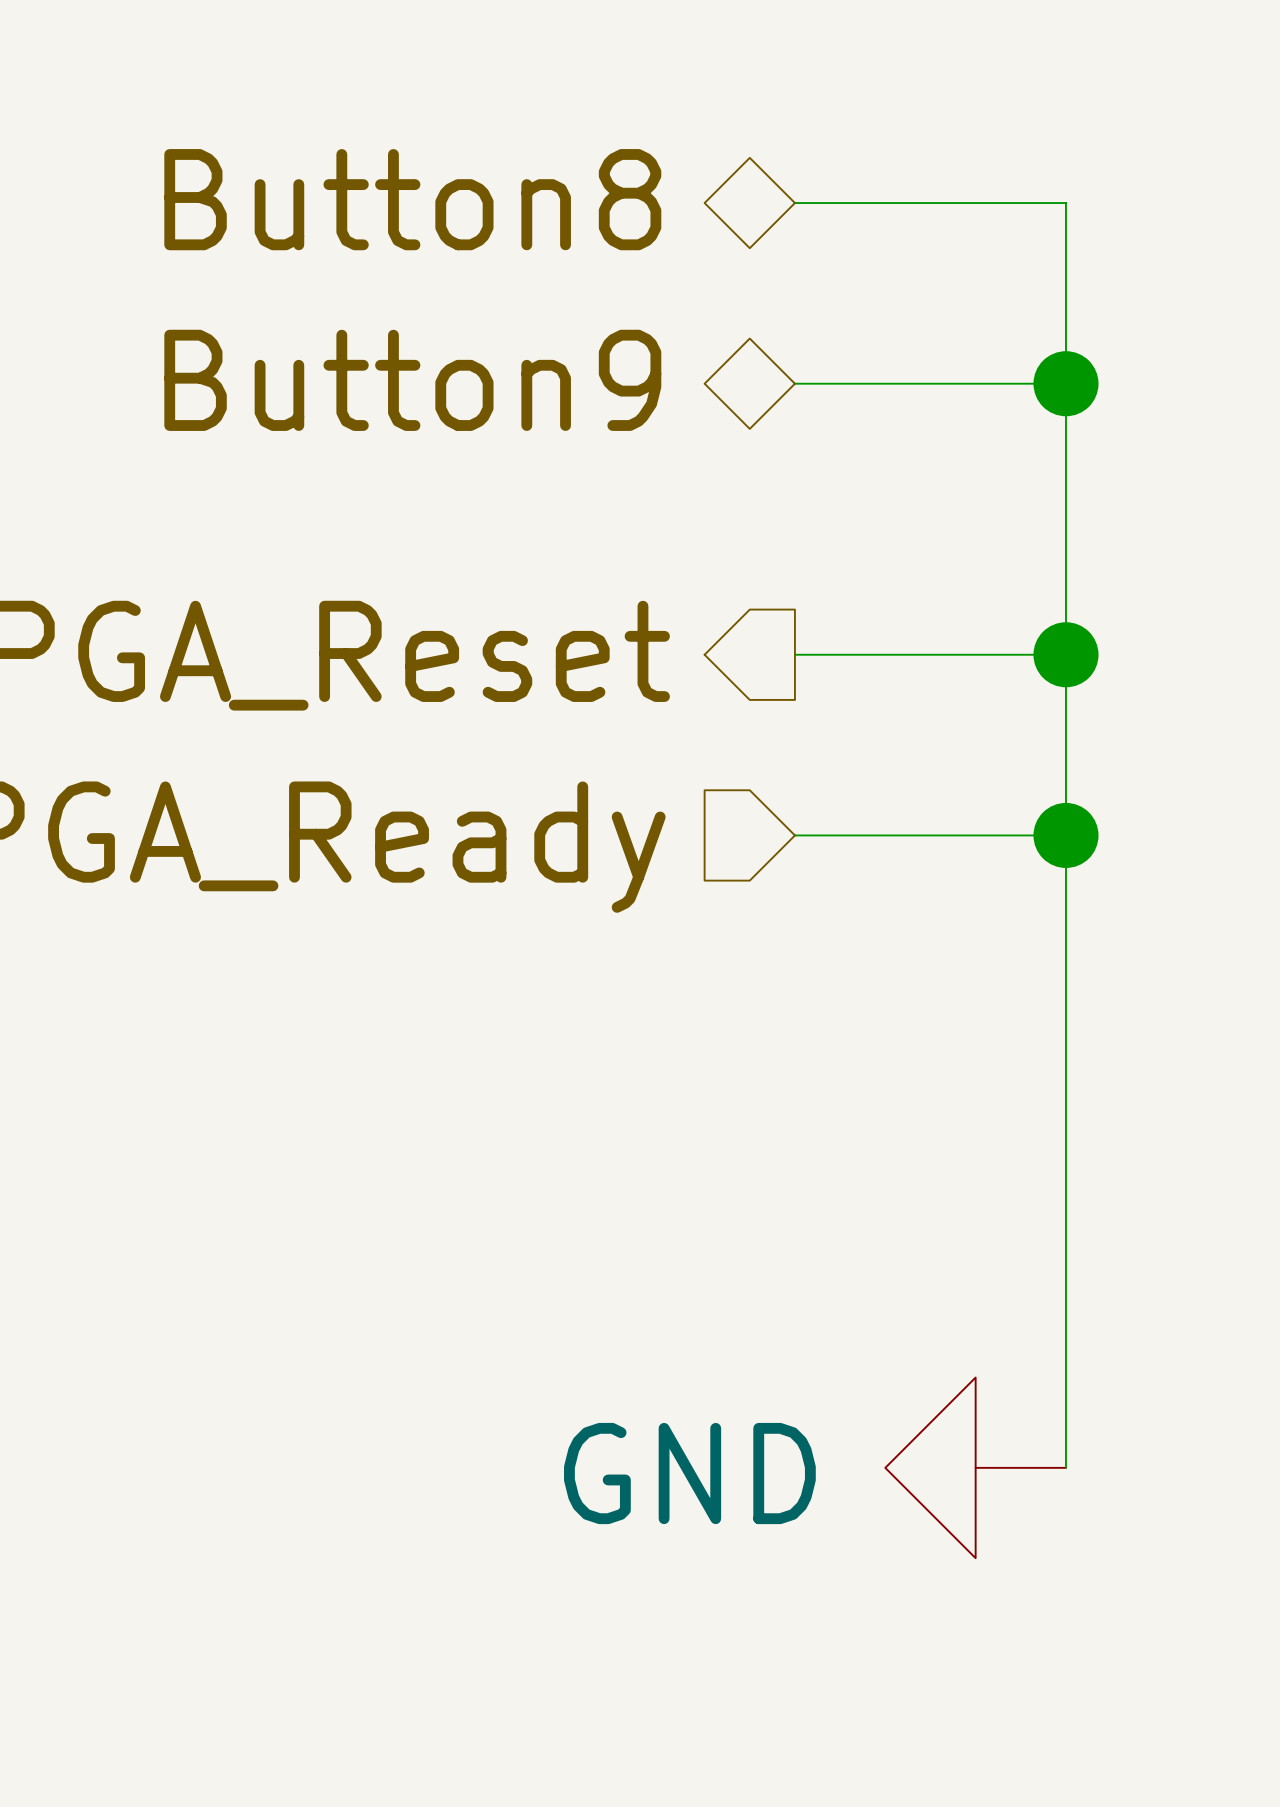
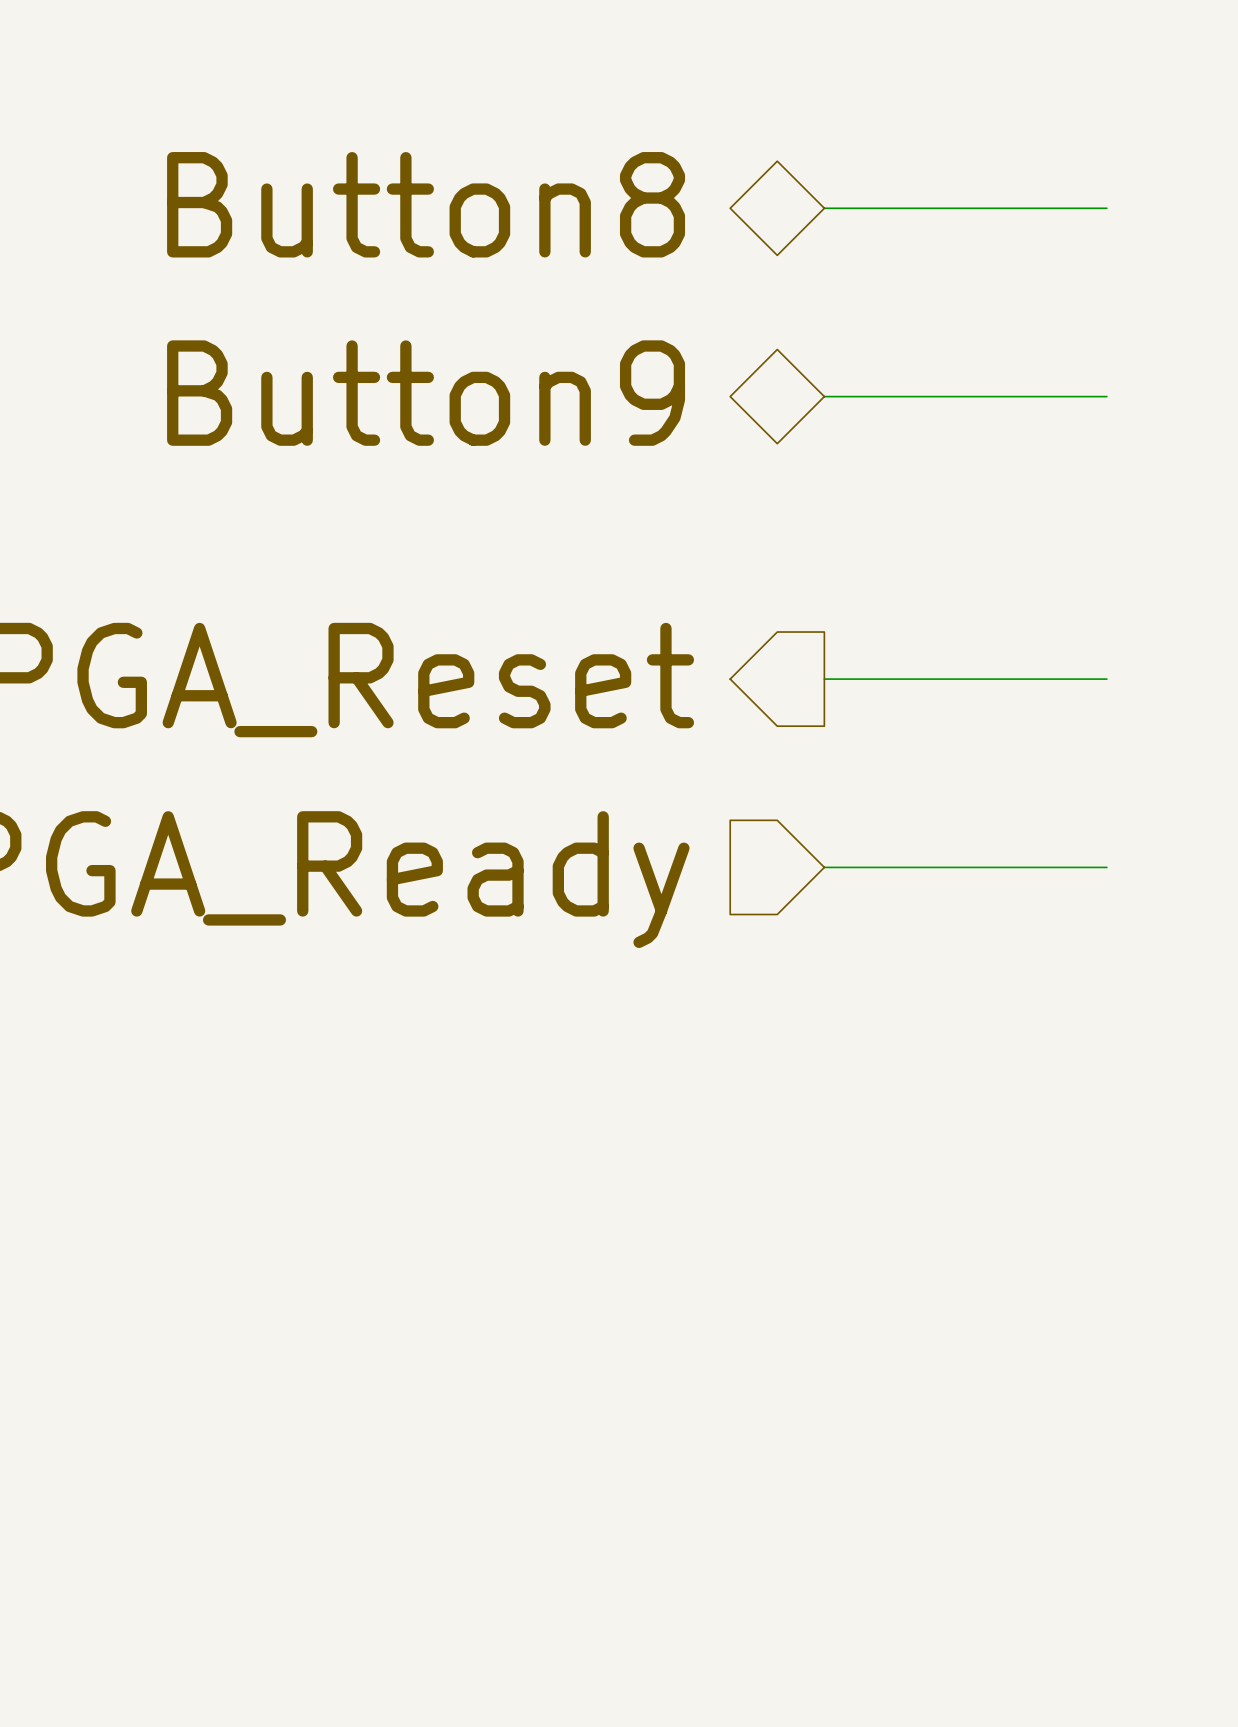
wire: (1065, 203) (1065, 1467) -> none
junction: (1065, 383) -> none
junction: (1065, 654) -> none
junction: (1065, 835) -> none
power symbol: GND (975, 1467) -> none

